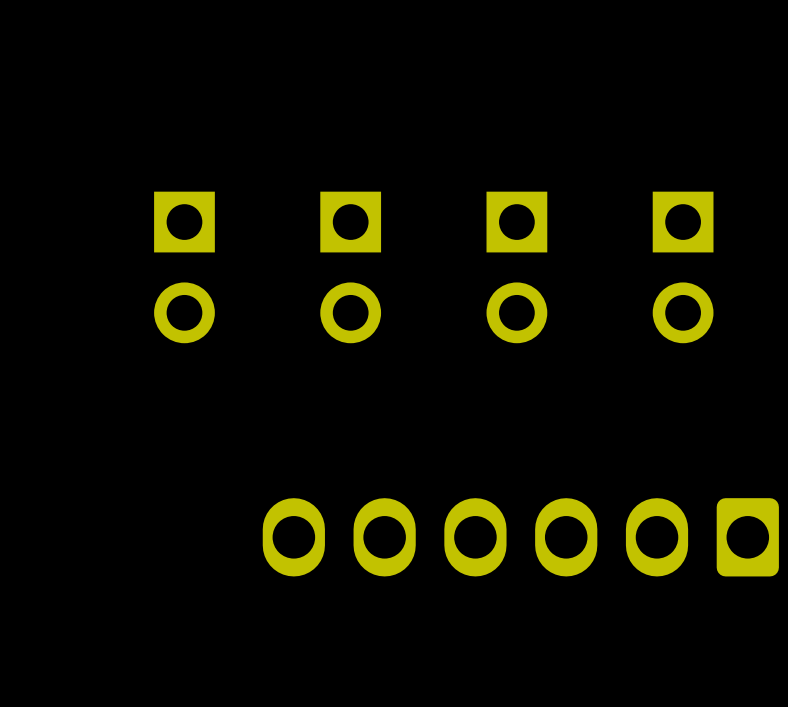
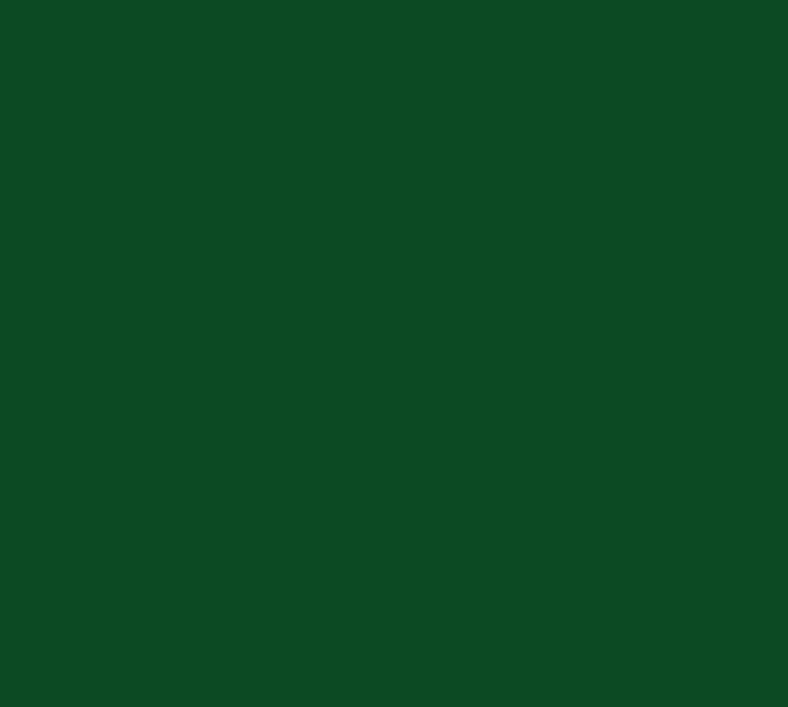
part: (184, 267) -> none
part: (350, 267) -> none
part: (516, 267) -> none
part: (683, 267) -> none
part: (520, 537) -> none

